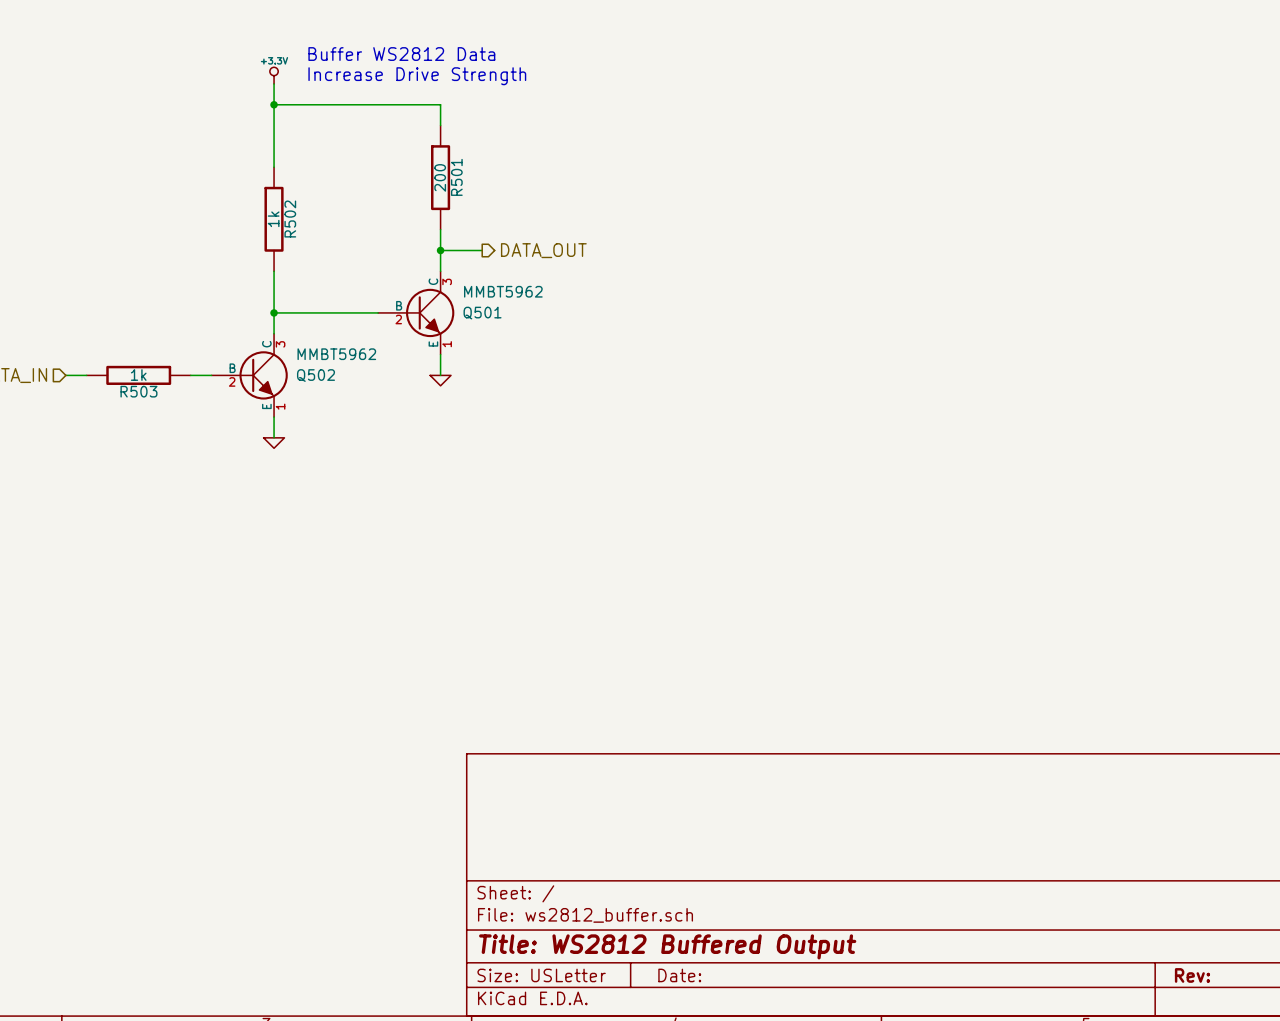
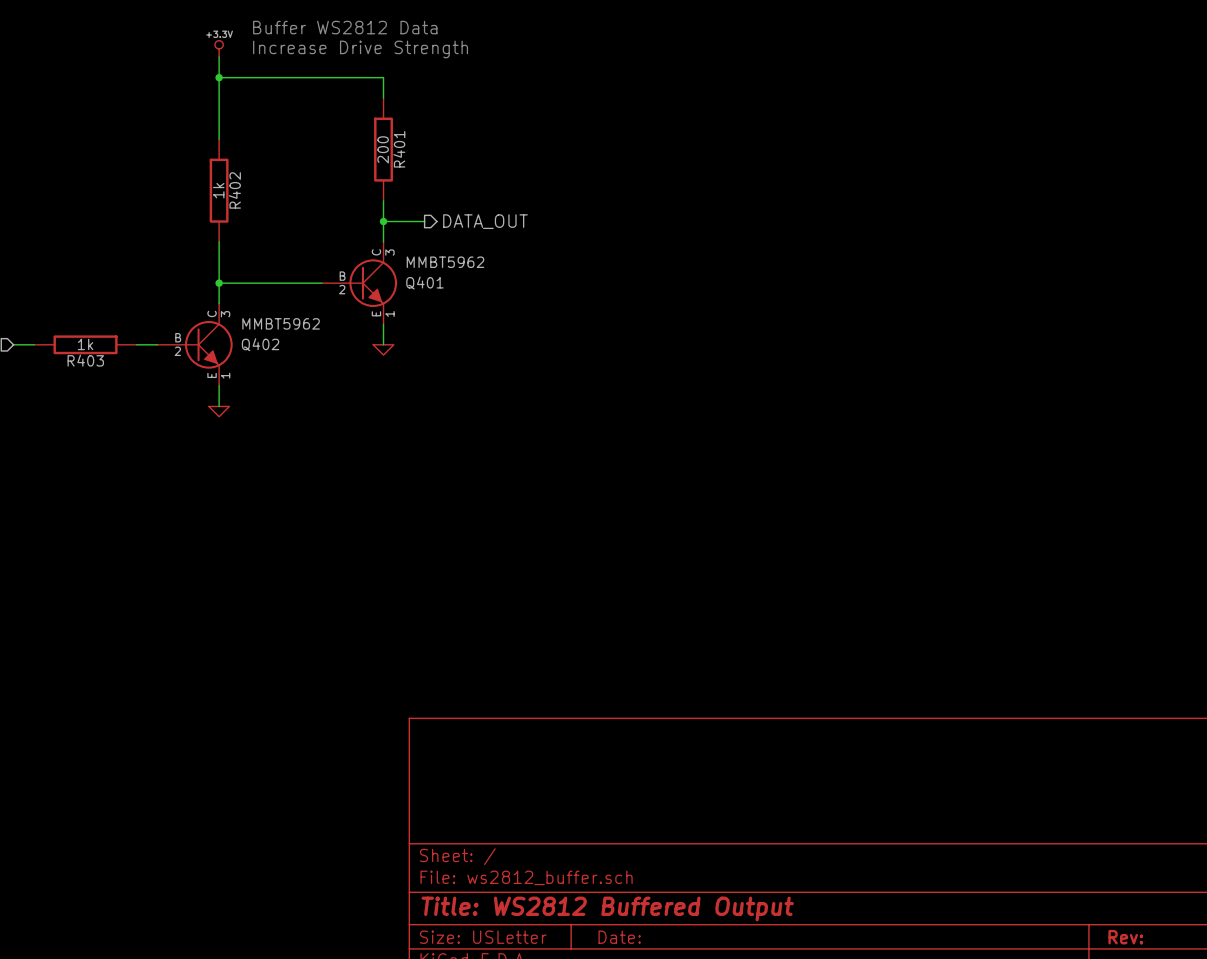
R501 name: R501 (456, 177) -> R401 (399, 149)
R502 name: R502 (290, 219) -> R402 (234, 190)
Q501 name: Q501 (482, 313) -> Q401 (424, 283)
Q502 name: Q502 (315, 375) -> Q402 (260, 344)
R503 name: R503 (138, 391) -> R403 (85, 360)

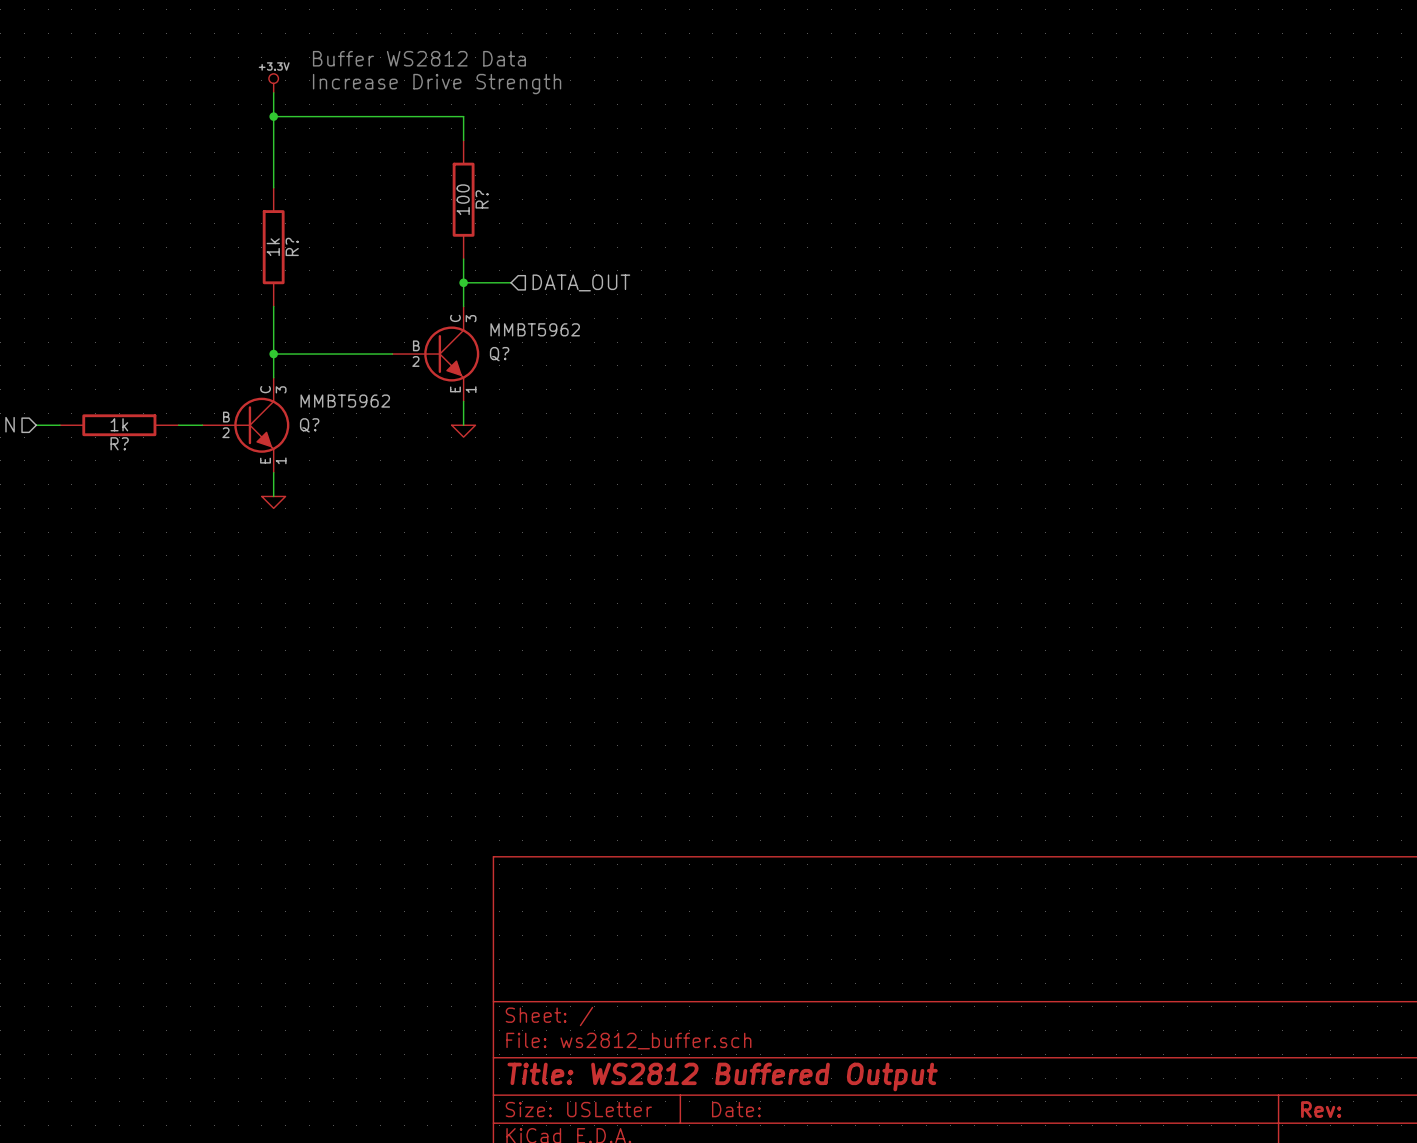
R401 value: 200 (383, 149) -> 100 (463, 199)
R401 name: R401 (399, 149) -> R? (482, 199)
R402 name: R402 (234, 190) -> R? (292, 246)
hierarchical label shape: output (485, 221) -> input (581, 282)
Q401 name: Q401 (424, 283) -> Q? (499, 354)
Q402 name: Q402 (260, 344) -> Q? (309, 425)
R403 name: R403 (85, 360) -> R? (119, 443)

